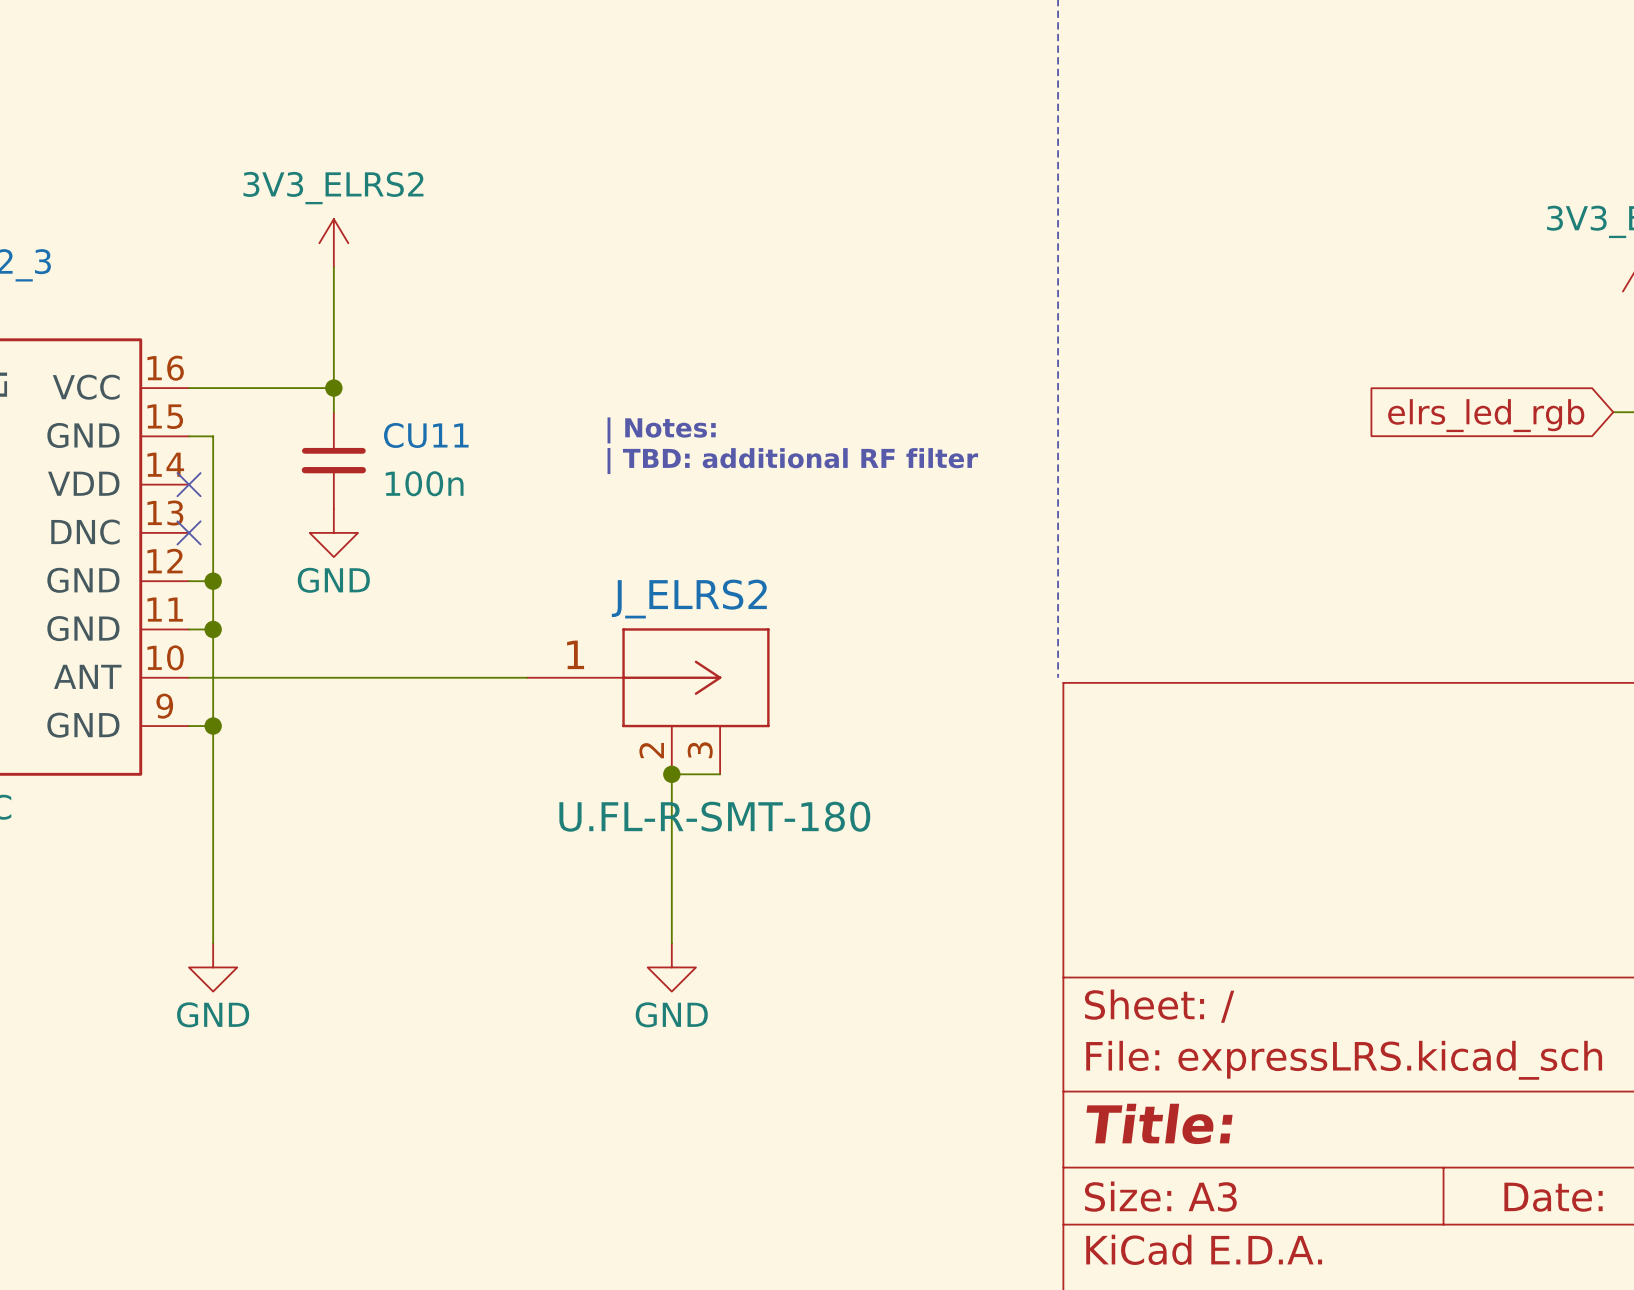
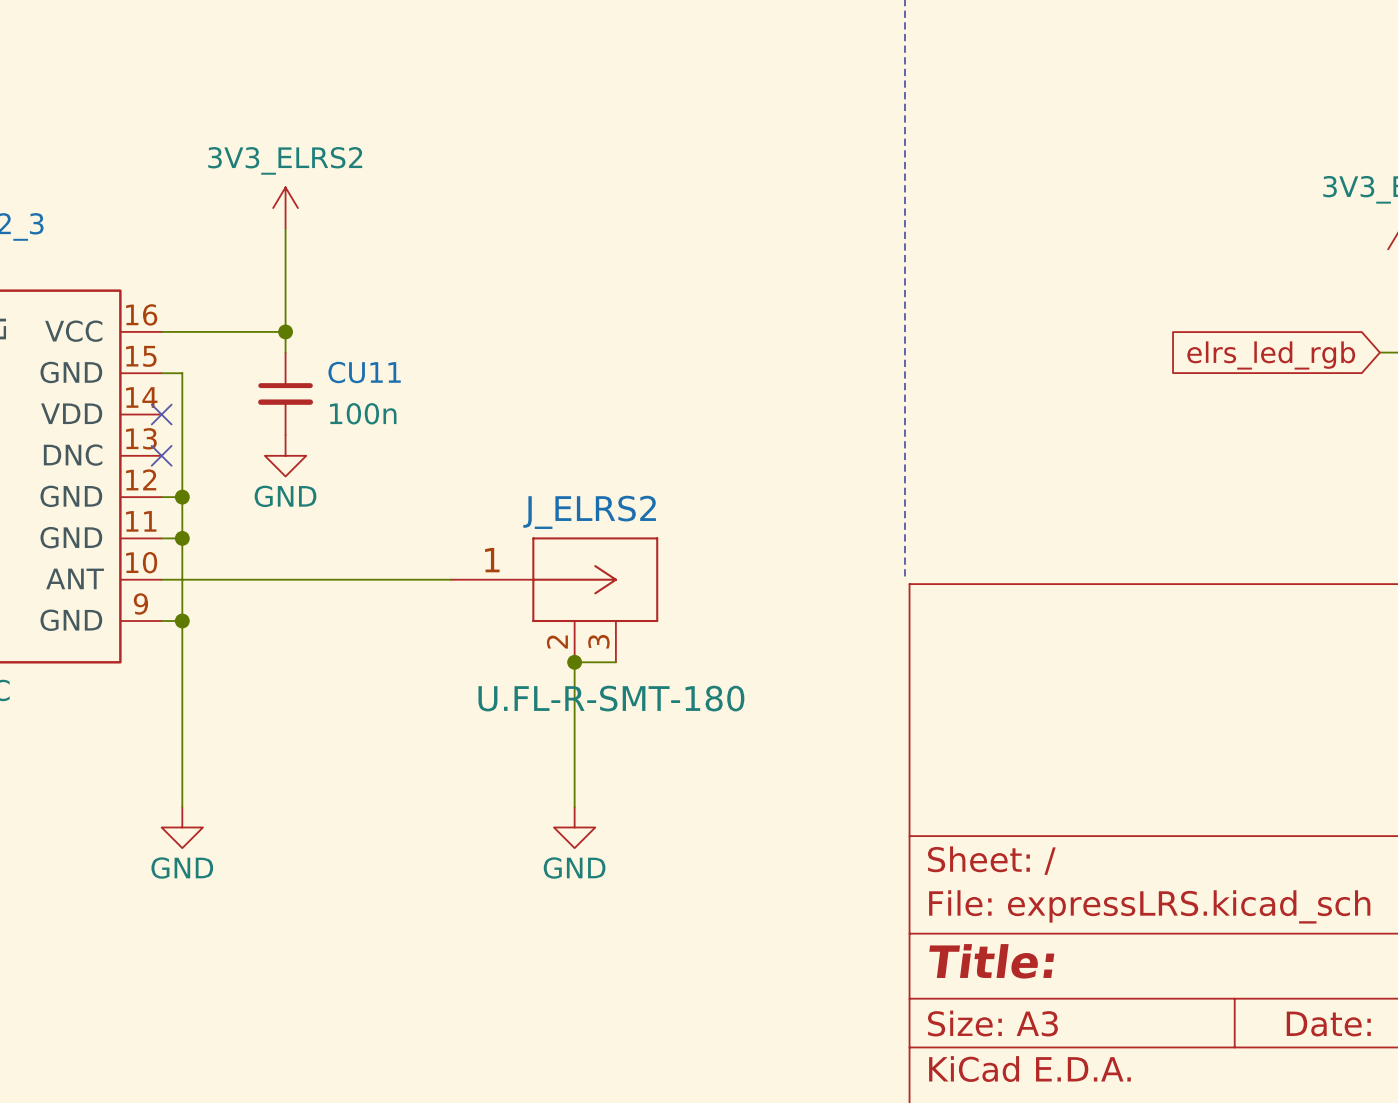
text: | Notes: (661, 430) -> none
text: | TBD: additional RF filter (792, 461) -> none

